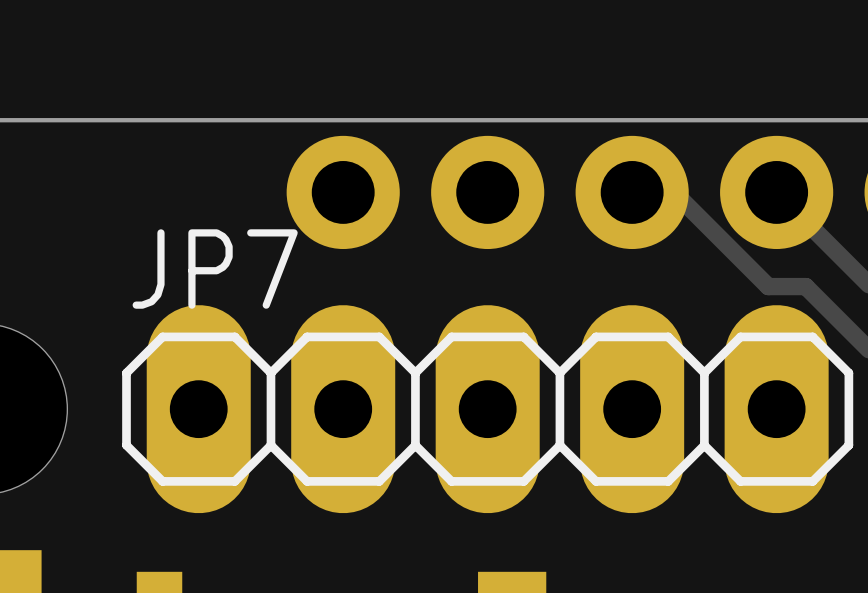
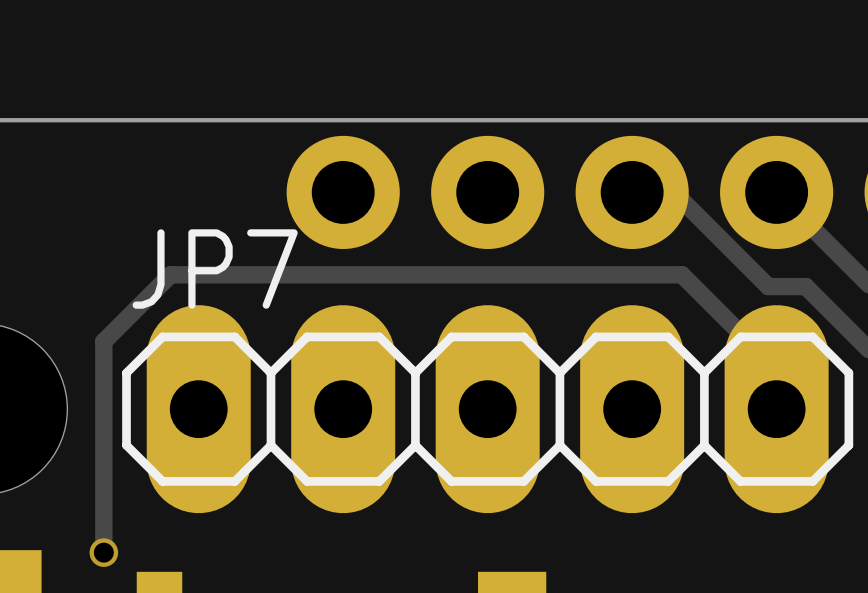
track: none -> (776, 409) (776, 369) (681, 274) (170, 274) (103, 341) (103, 552)
via: none -> (103, 552)

